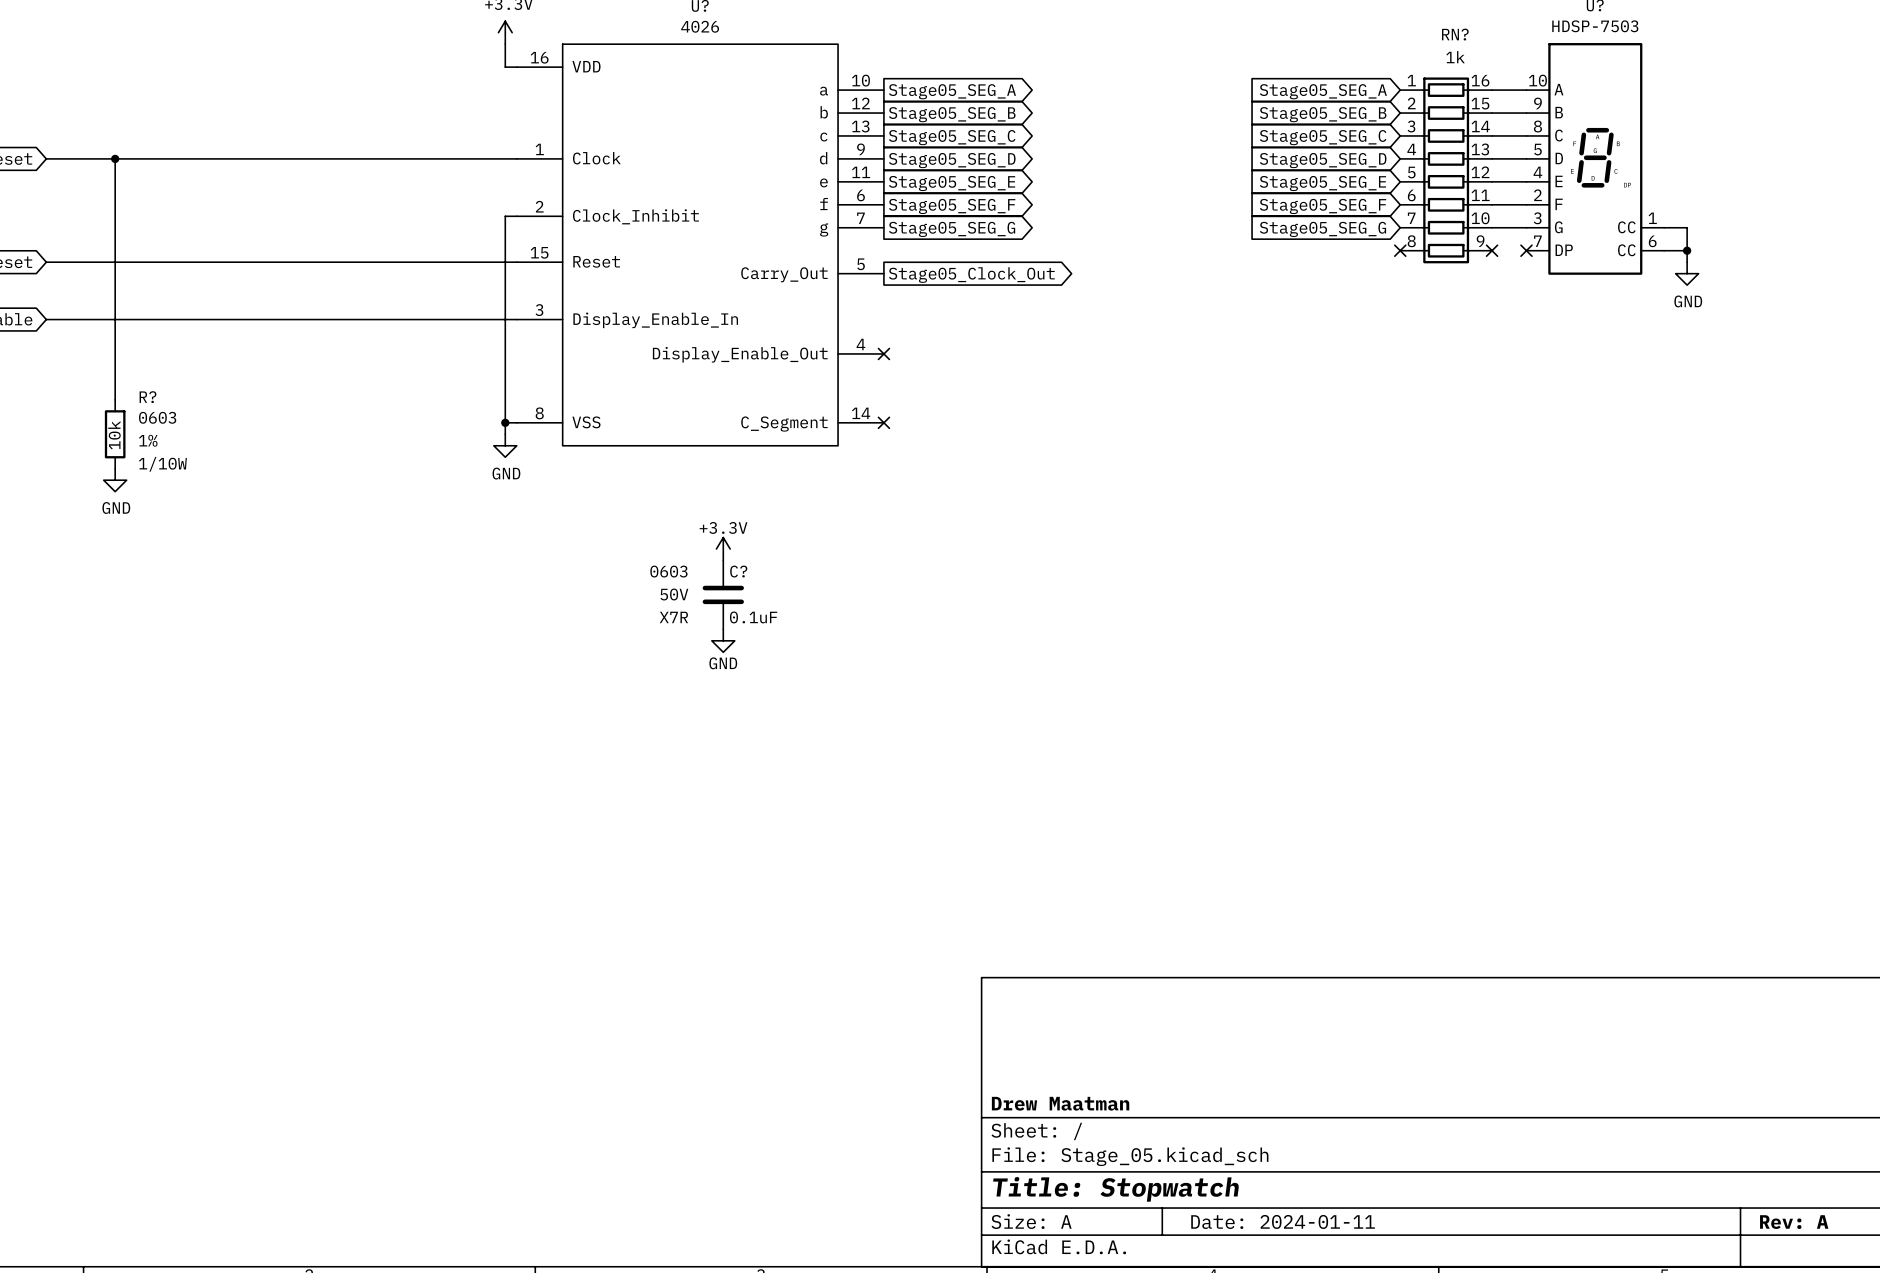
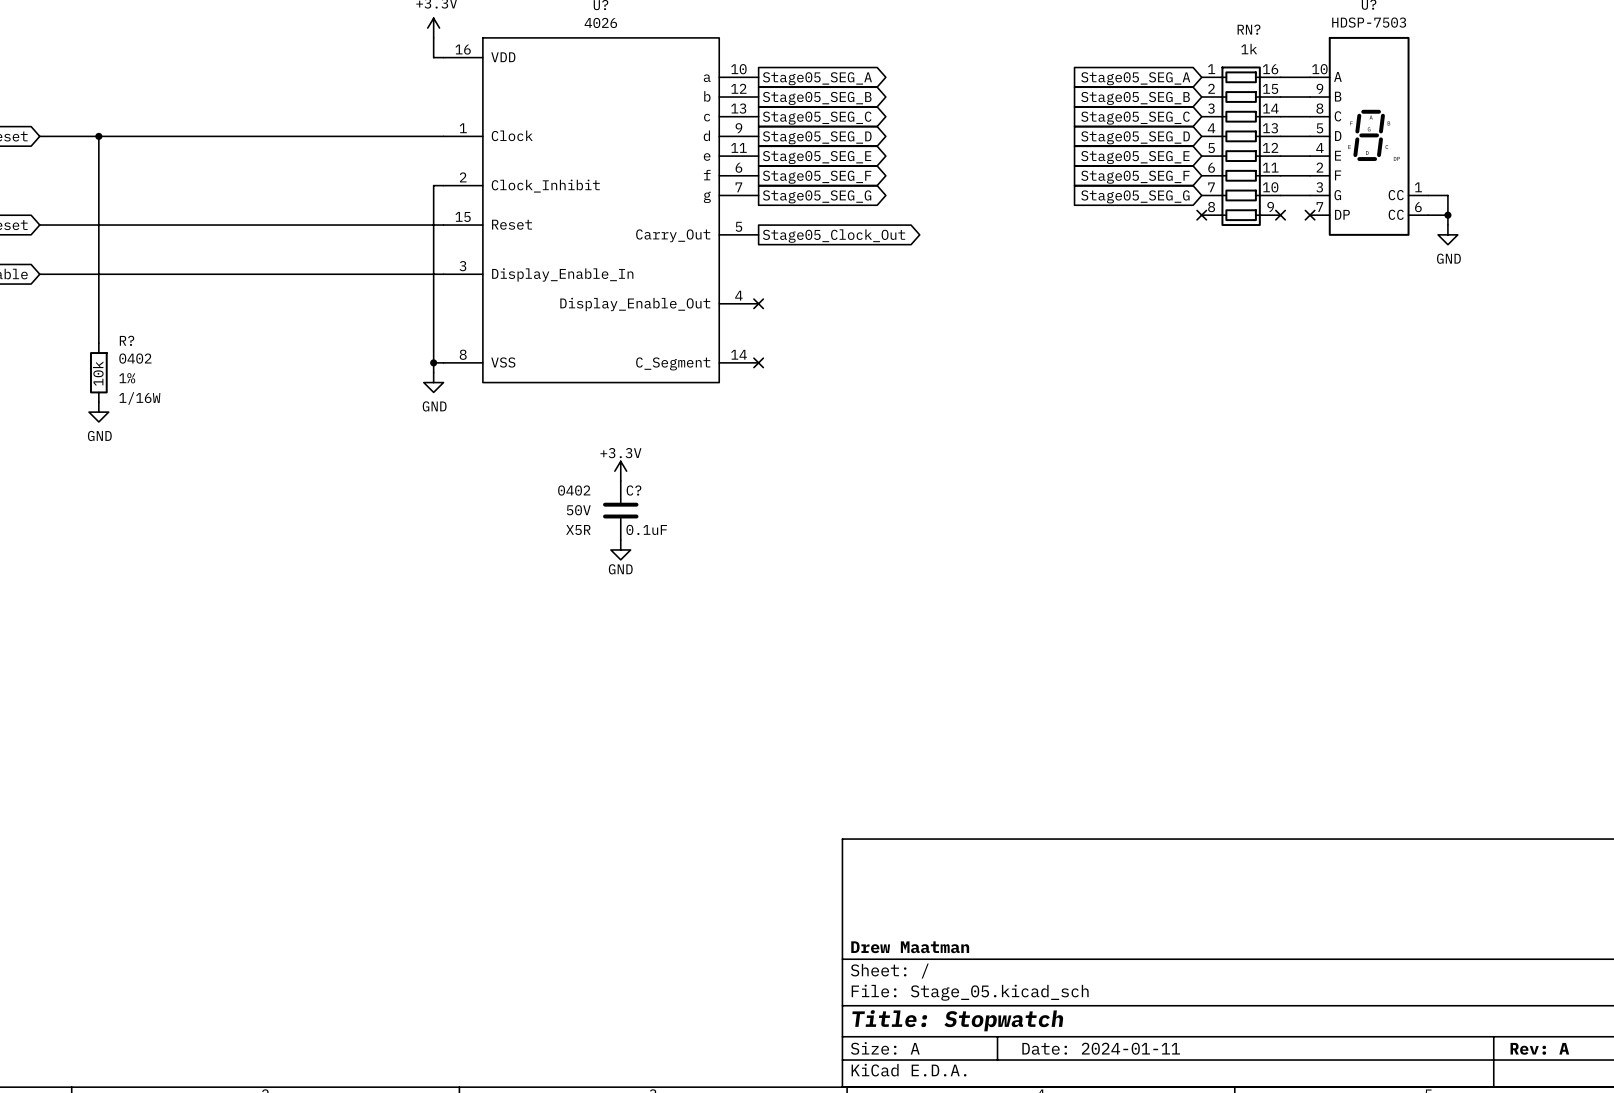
R? text: 0603 (157, 417) -> 0402 (135, 358)
R? text: 1/10W (162, 464) -> 1/16W (139, 398)
C? text: 0603 (668, 571) -> 0402 (574, 490)
C? text: X7R (673, 617) -> X5R (578, 530)

